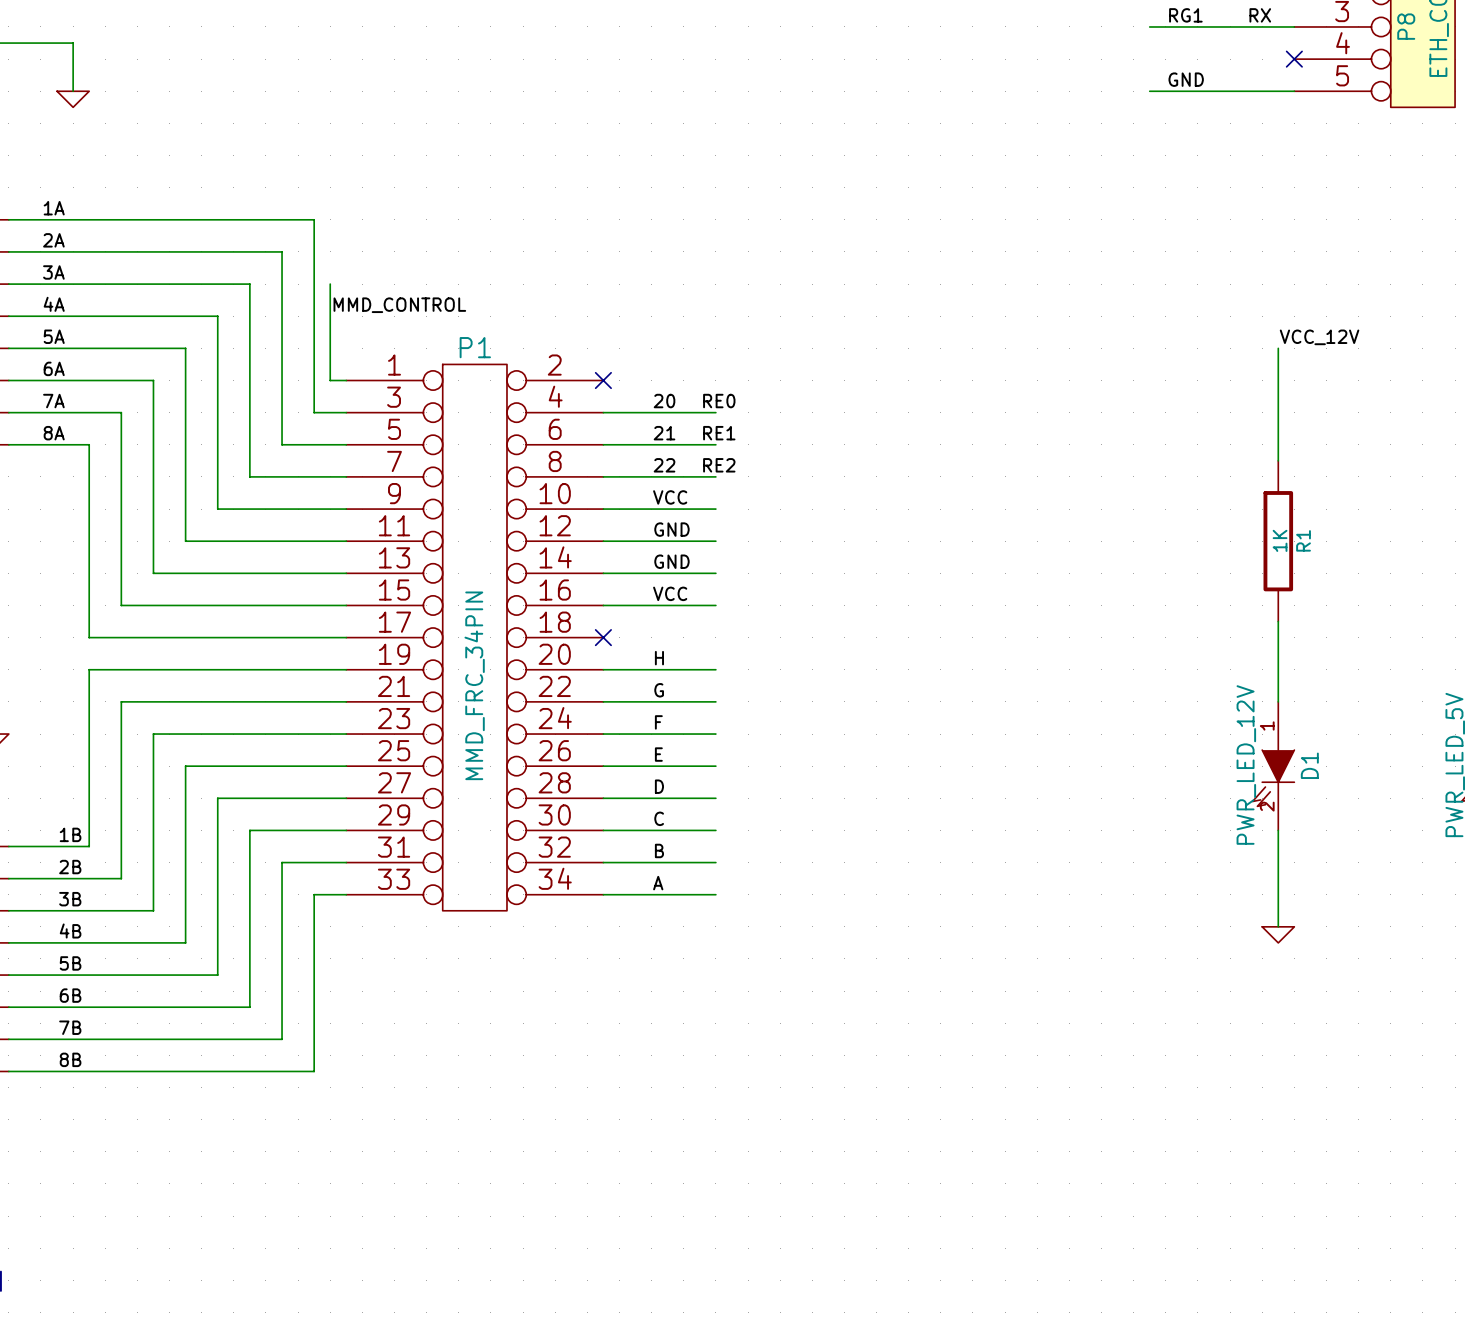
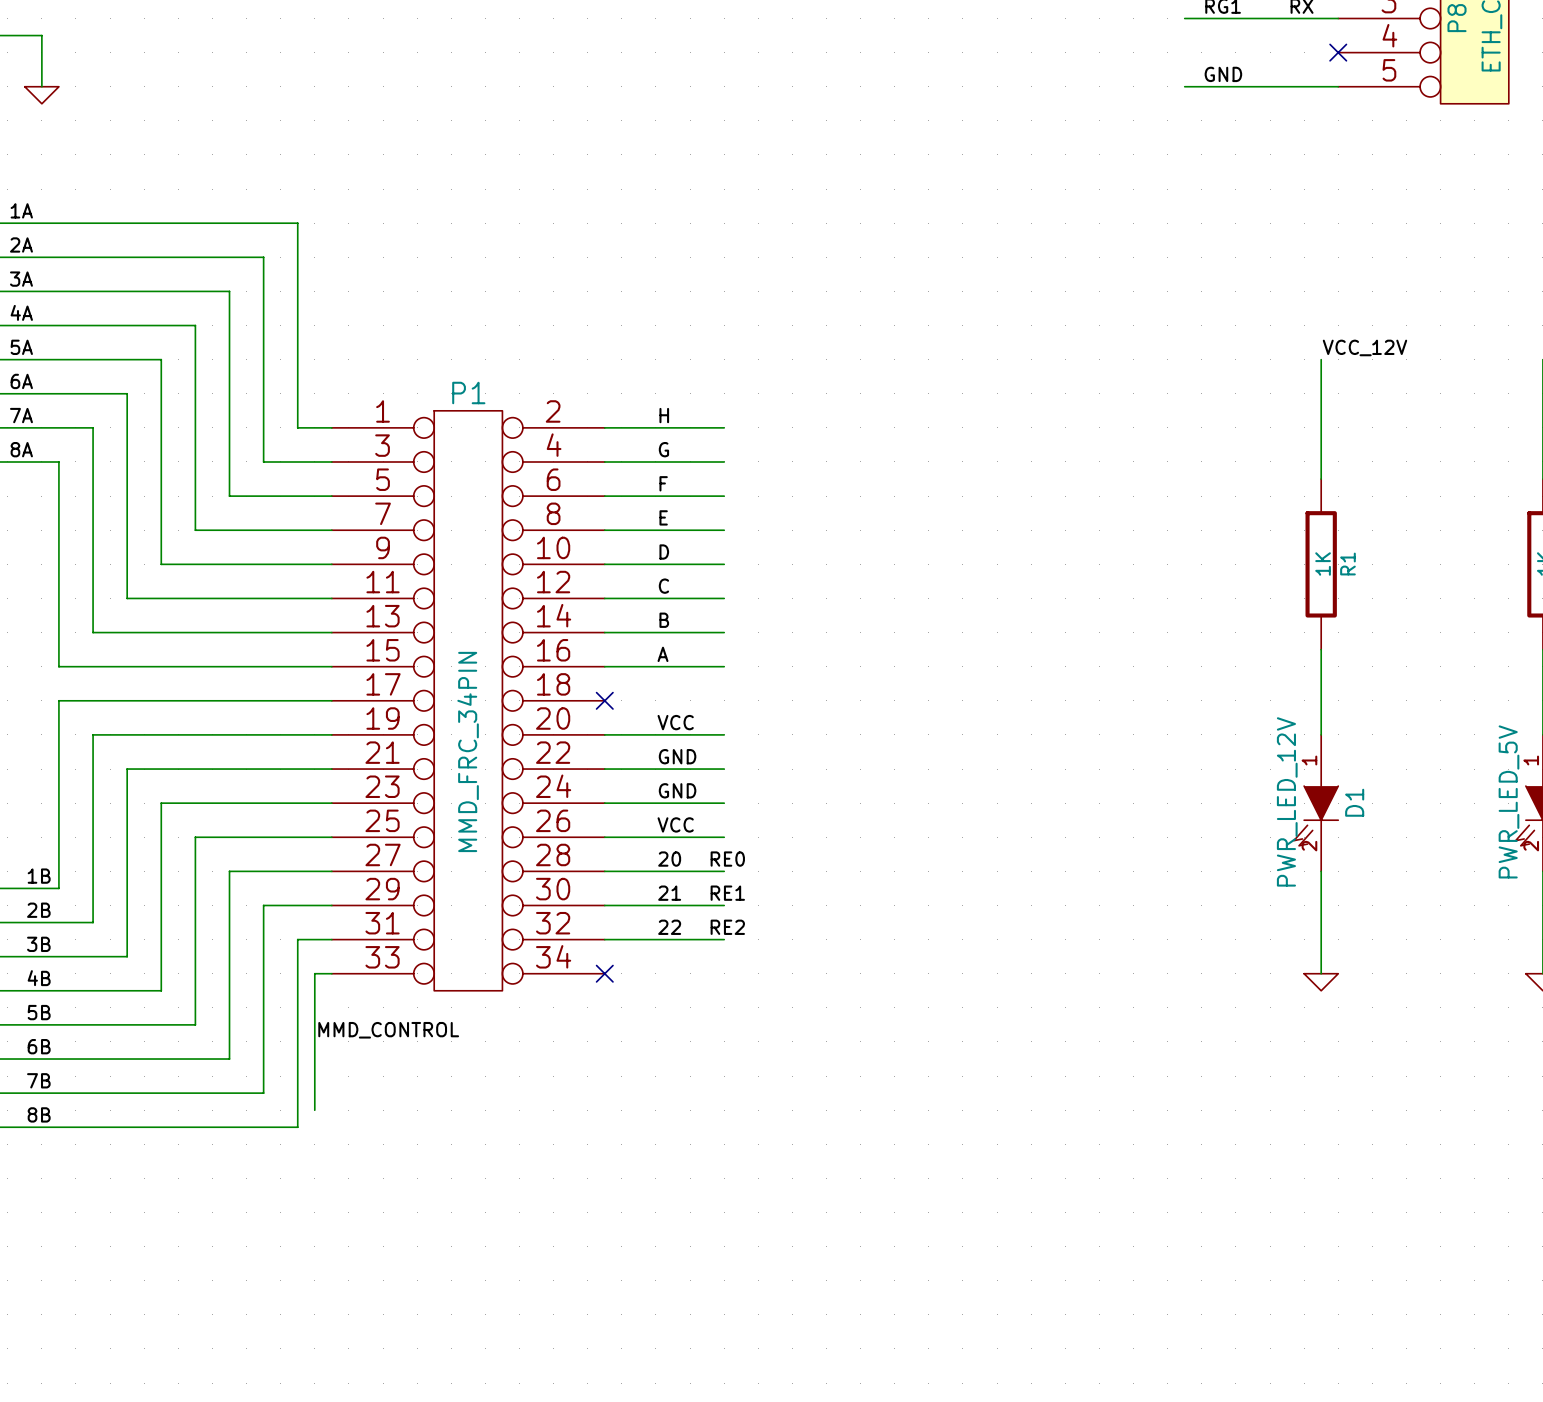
wire: (330, 284) (330, 380) (346, 380) -> none
label: MMD_CONTROL (399, 305) -> none
no-connect mark: (603, 380) -> none
label: 20 (664, 401) -> H (664, 415)
label: RE0 (719, 401) -> none
label: 21 (664, 433) -> G (663, 449)
label: RE1 (719, 433) -> none
label: 22 (664, 465) -> F (663, 483)
label: RE2 (719, 465) -> none
label: VCC (670, 497) -> E (663, 517)
label: GND (671, 529) -> D (664, 552)
label: GND (671, 561) -> C (663, 586)
label: VCC (670, 593) -> B (664, 620)
label: none -> A (663, 654)
P1 position: (474, 637) -> (468, 700)
no-connect mark position: (603, 637) -> (604, 700)
label: H (659, 658) -> none
wire: (603, 669) (715, 669) -> (604, 666) (724, 666)
label: G (659, 690) -> VCC (675, 722)
label: F (658, 722) -> GND (677, 756)
label: E (658, 754) -> GND (677, 790)
label: D (659, 786) -> VCC (675, 824)
label: C (659, 818) -> 20 (669, 859)
label: none -> RE0 (727, 859)
label: B (659, 850) -> 21 (669, 893)
label: none -> RE1 (727, 893)
label: A (658, 883) -> 22 (669, 927)
label: none -> RE2 (727, 927)
wire: none -> (331, 973) (314, 973) (314, 1110)
no-connect mark: none -> (604, 973)
label: none -> MMD_CONTROL (388, 1030)

